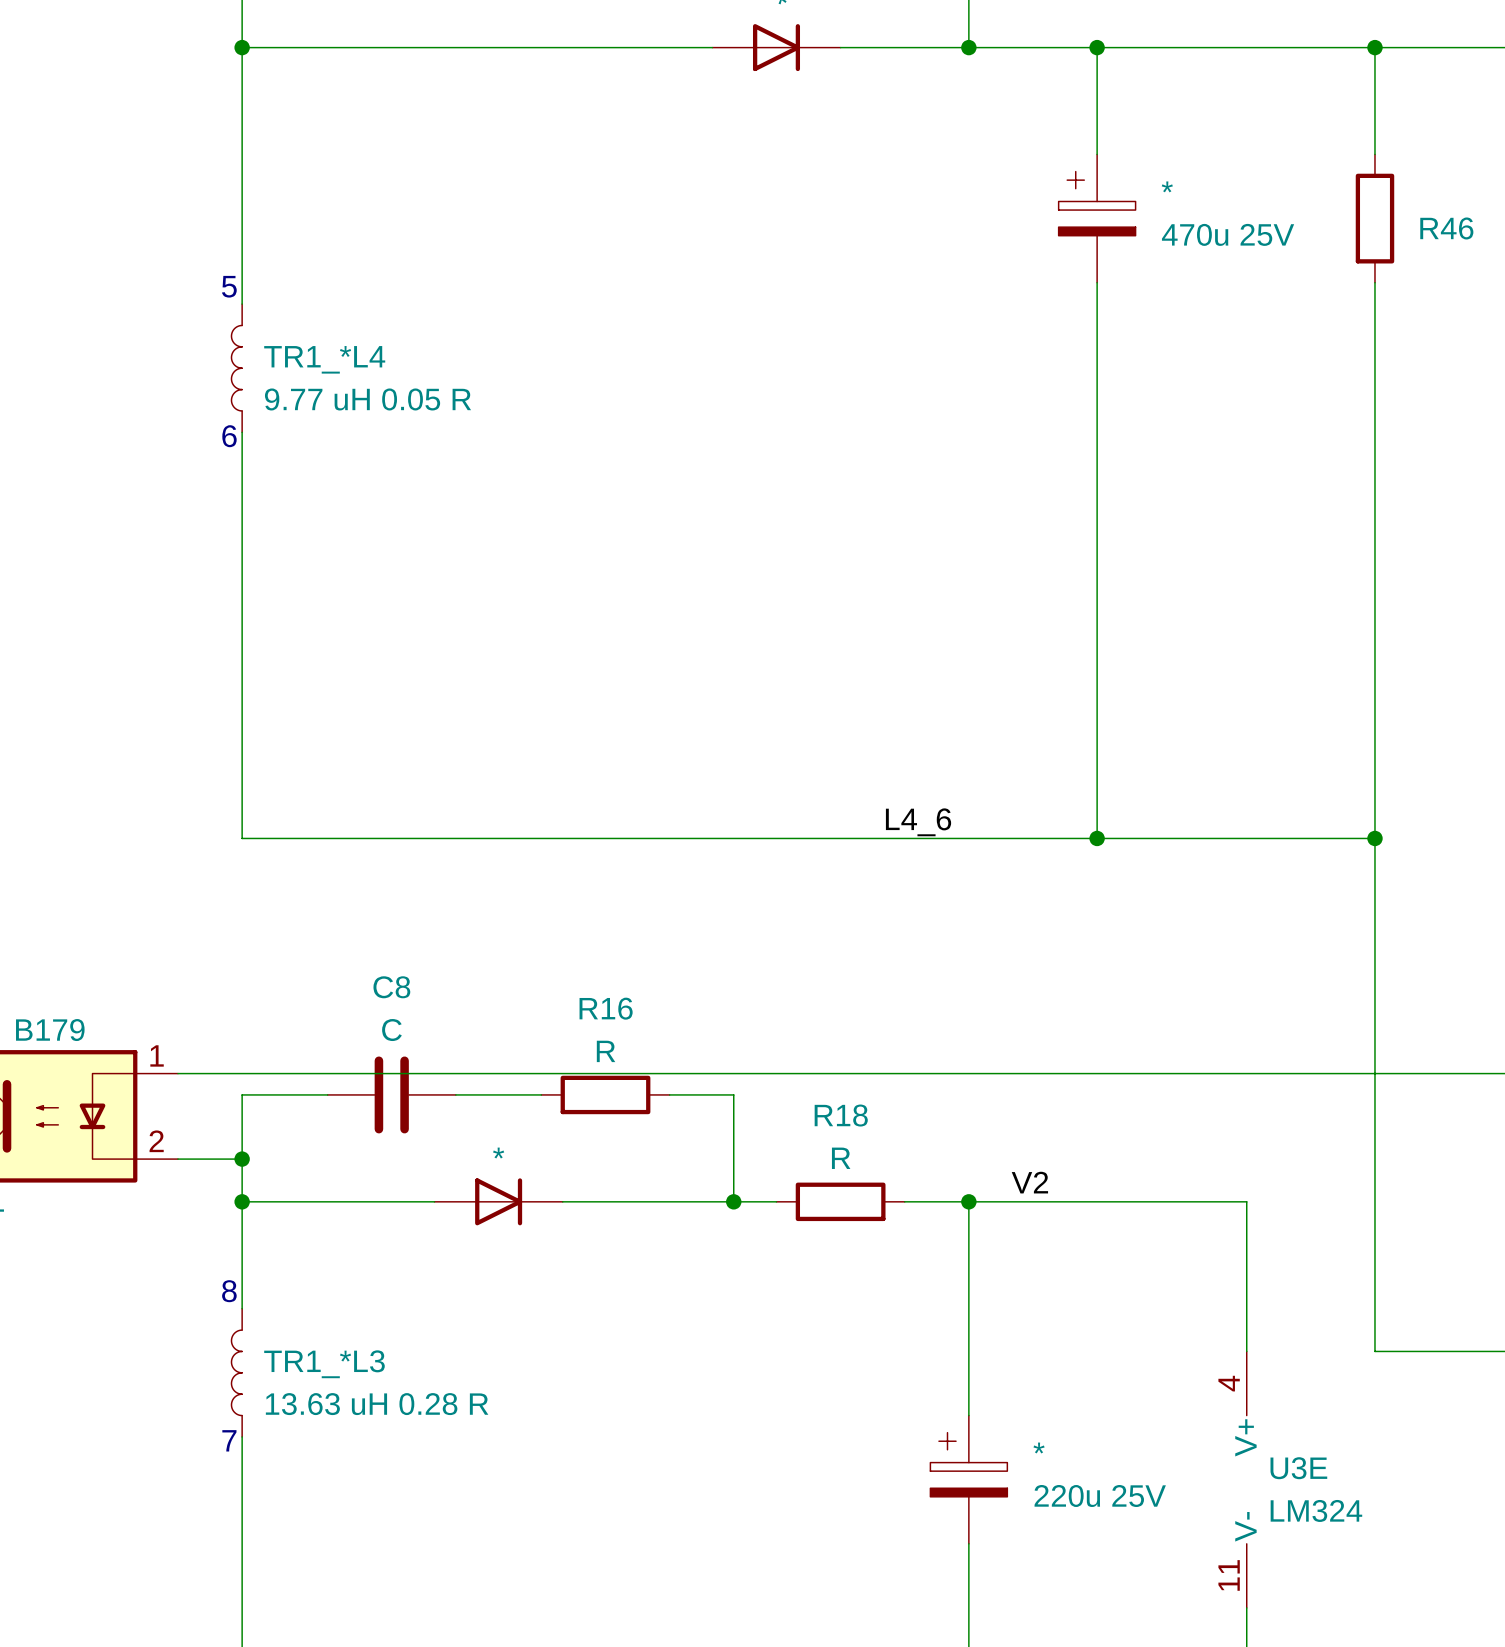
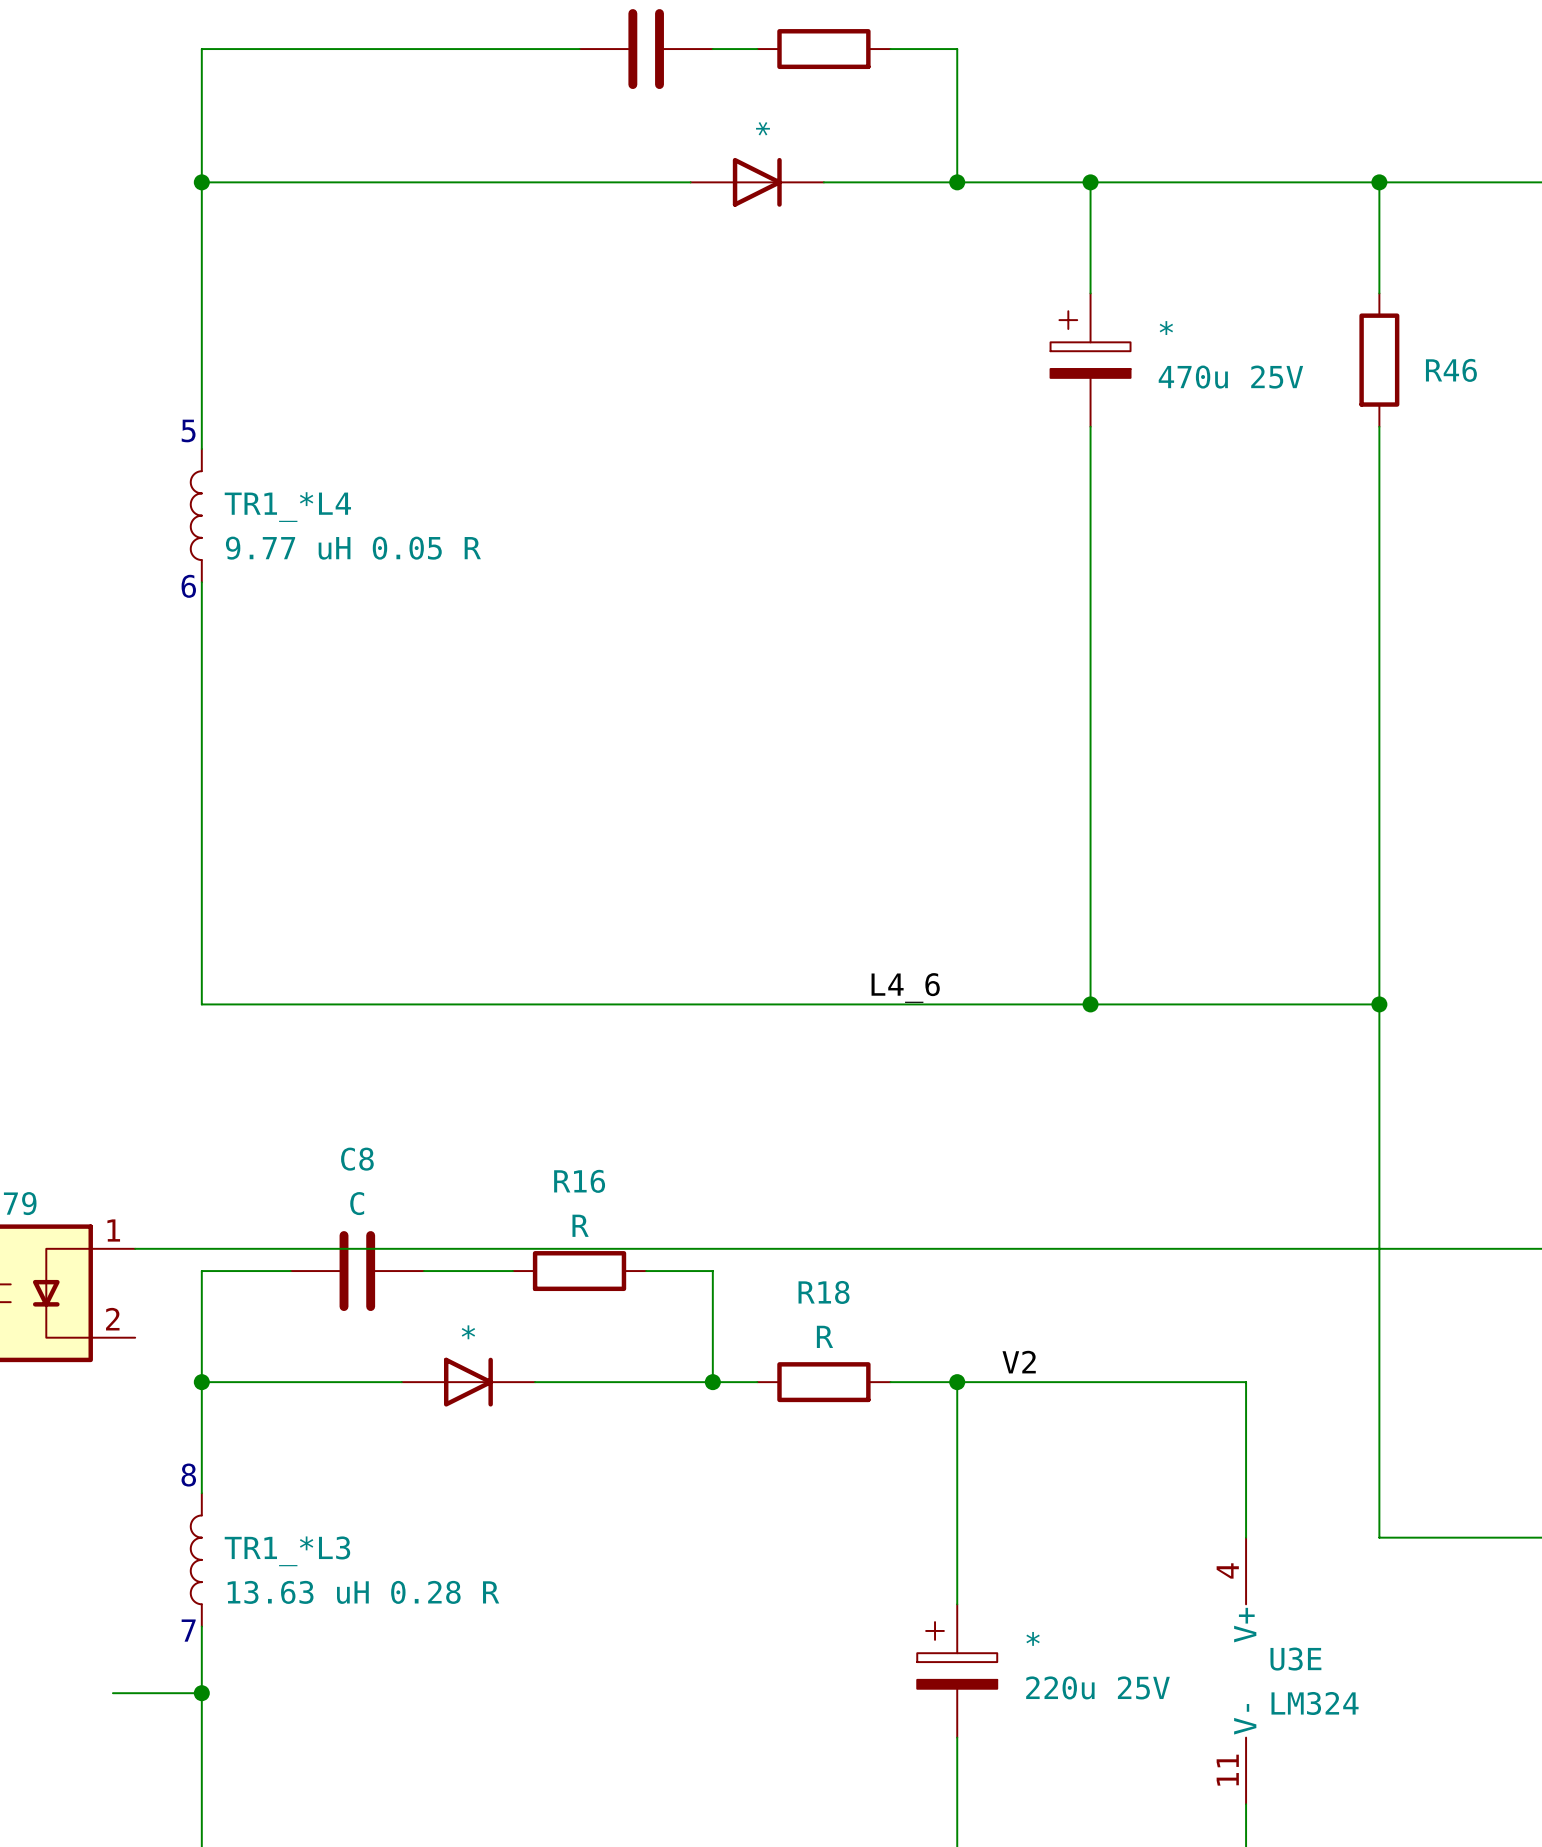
wire: (178, 1159) (242, 1159) -> none
junction: (242, 1159) -> none
wire: none -> (112, 1693) (201, 1693)
junction: none -> (201, 1693)

